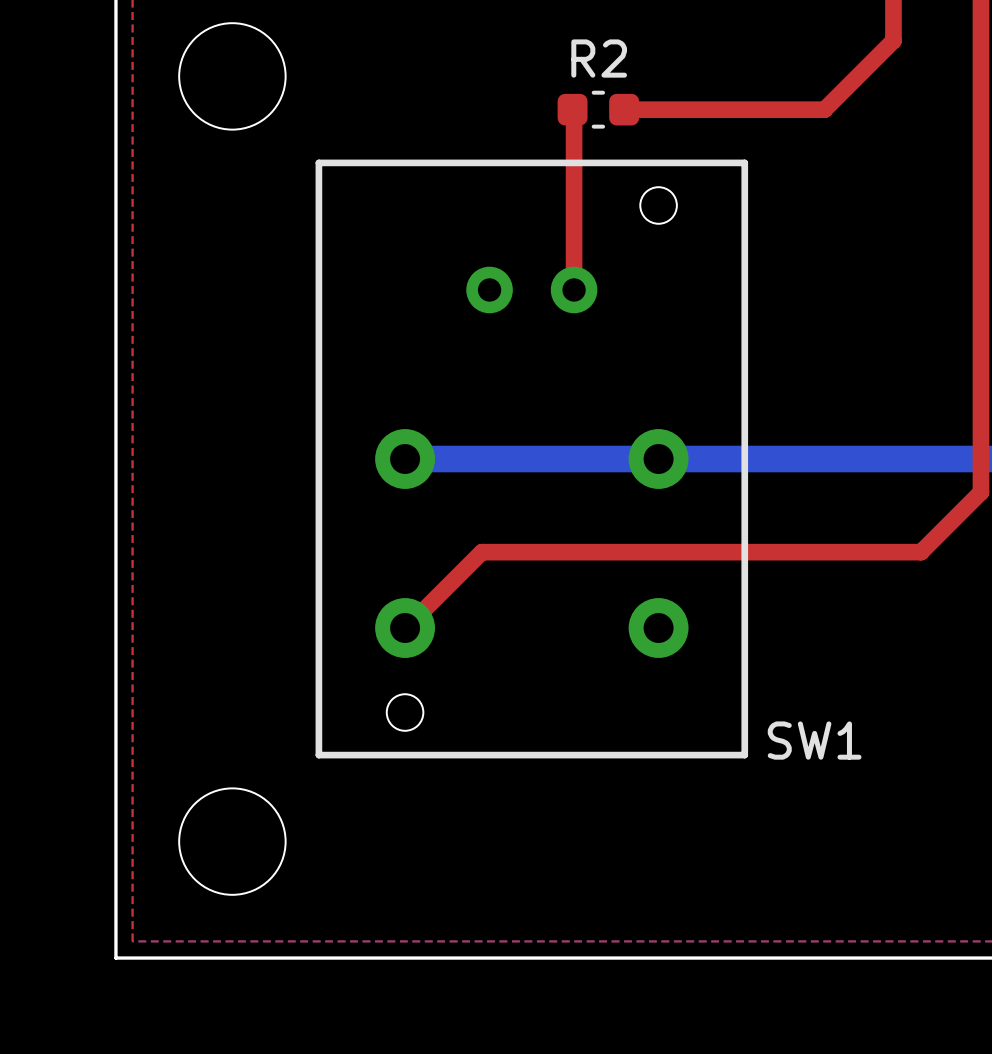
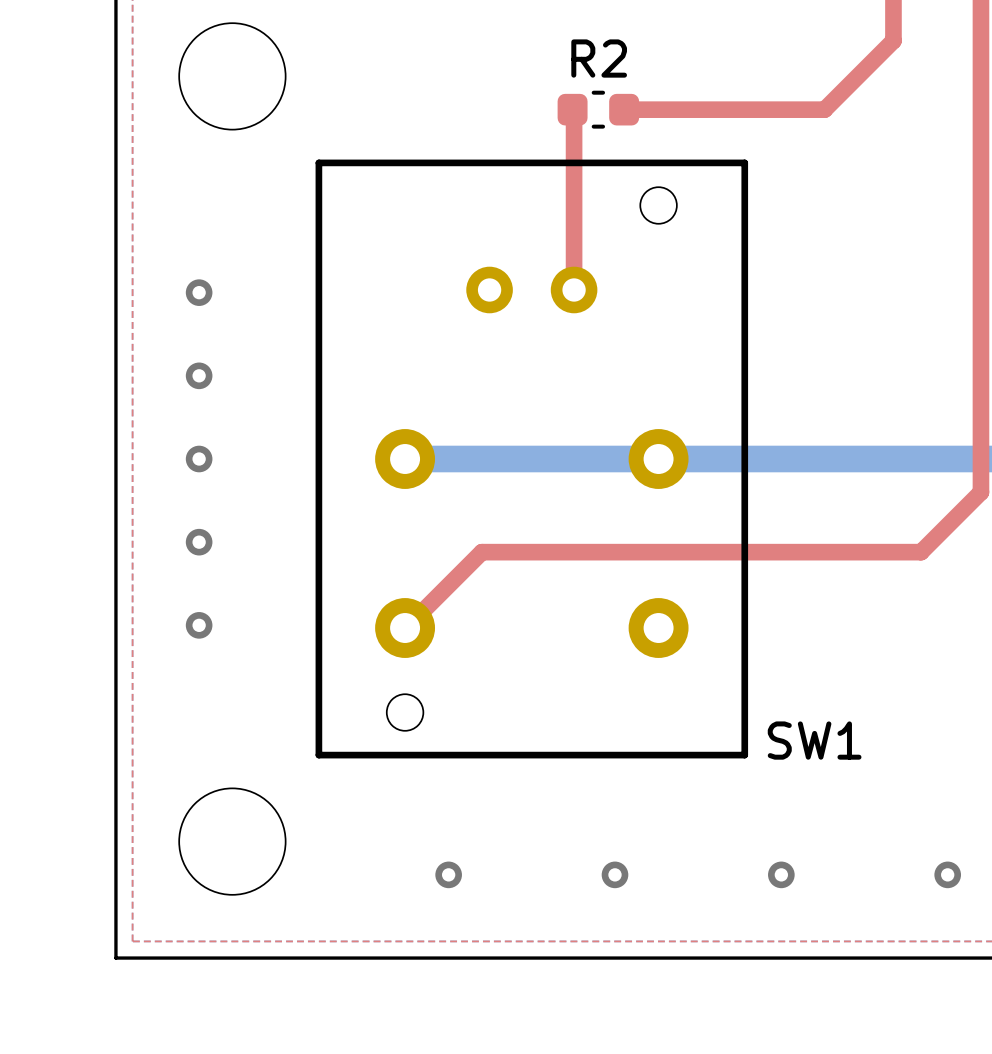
via: none -> (199, 292)
via: none -> (199, 375)
via: none -> (199, 459)
via: none -> (199, 542)
via: none -> (199, 625)
via: none -> (448, 874)
via: none -> (614, 874)
via: none -> (781, 874)
via: none -> (947, 874)

